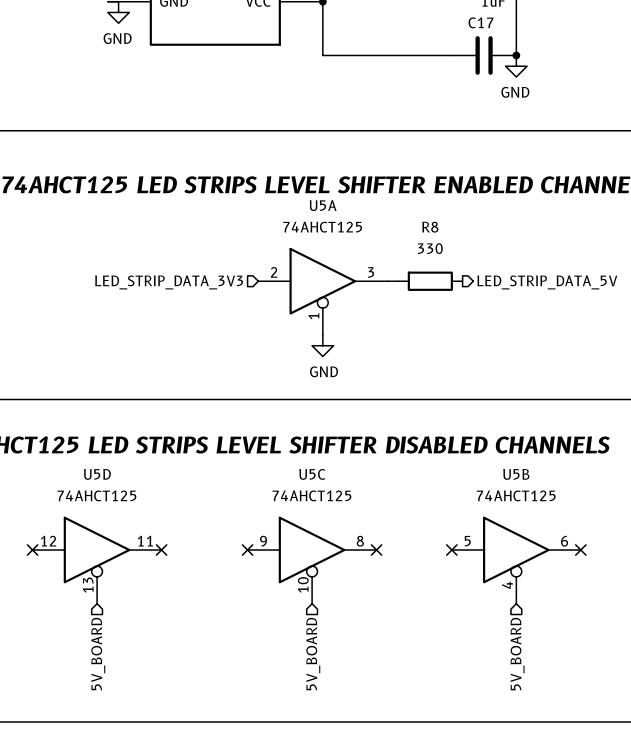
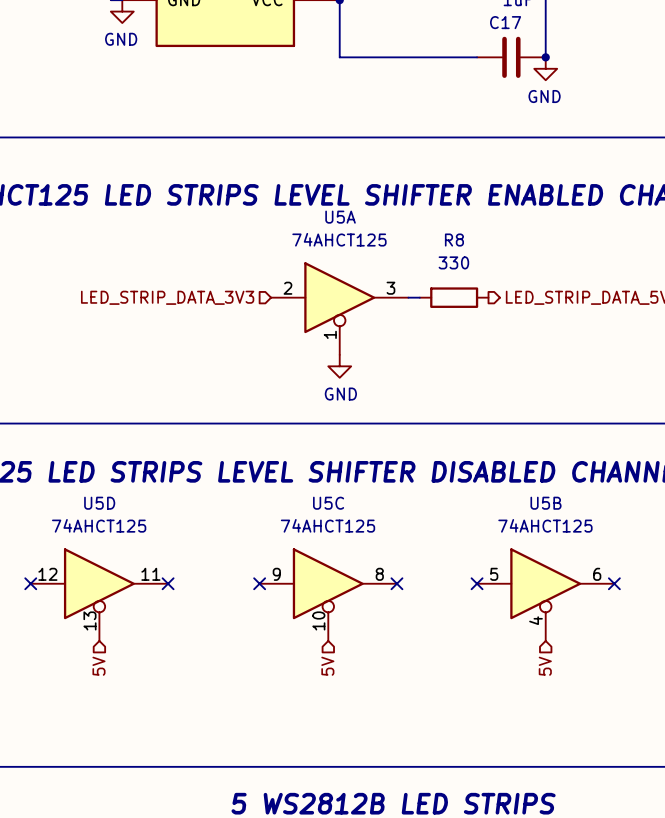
hierarchical label: 5V_BOARD (98, 654) -> 5V (98, 666)
hierarchical label: 5V_BOARD (313, 654) -> 5V (327, 666)
hierarchical label: 5V_BOARD (517, 654) -> 5V (545, 666)

